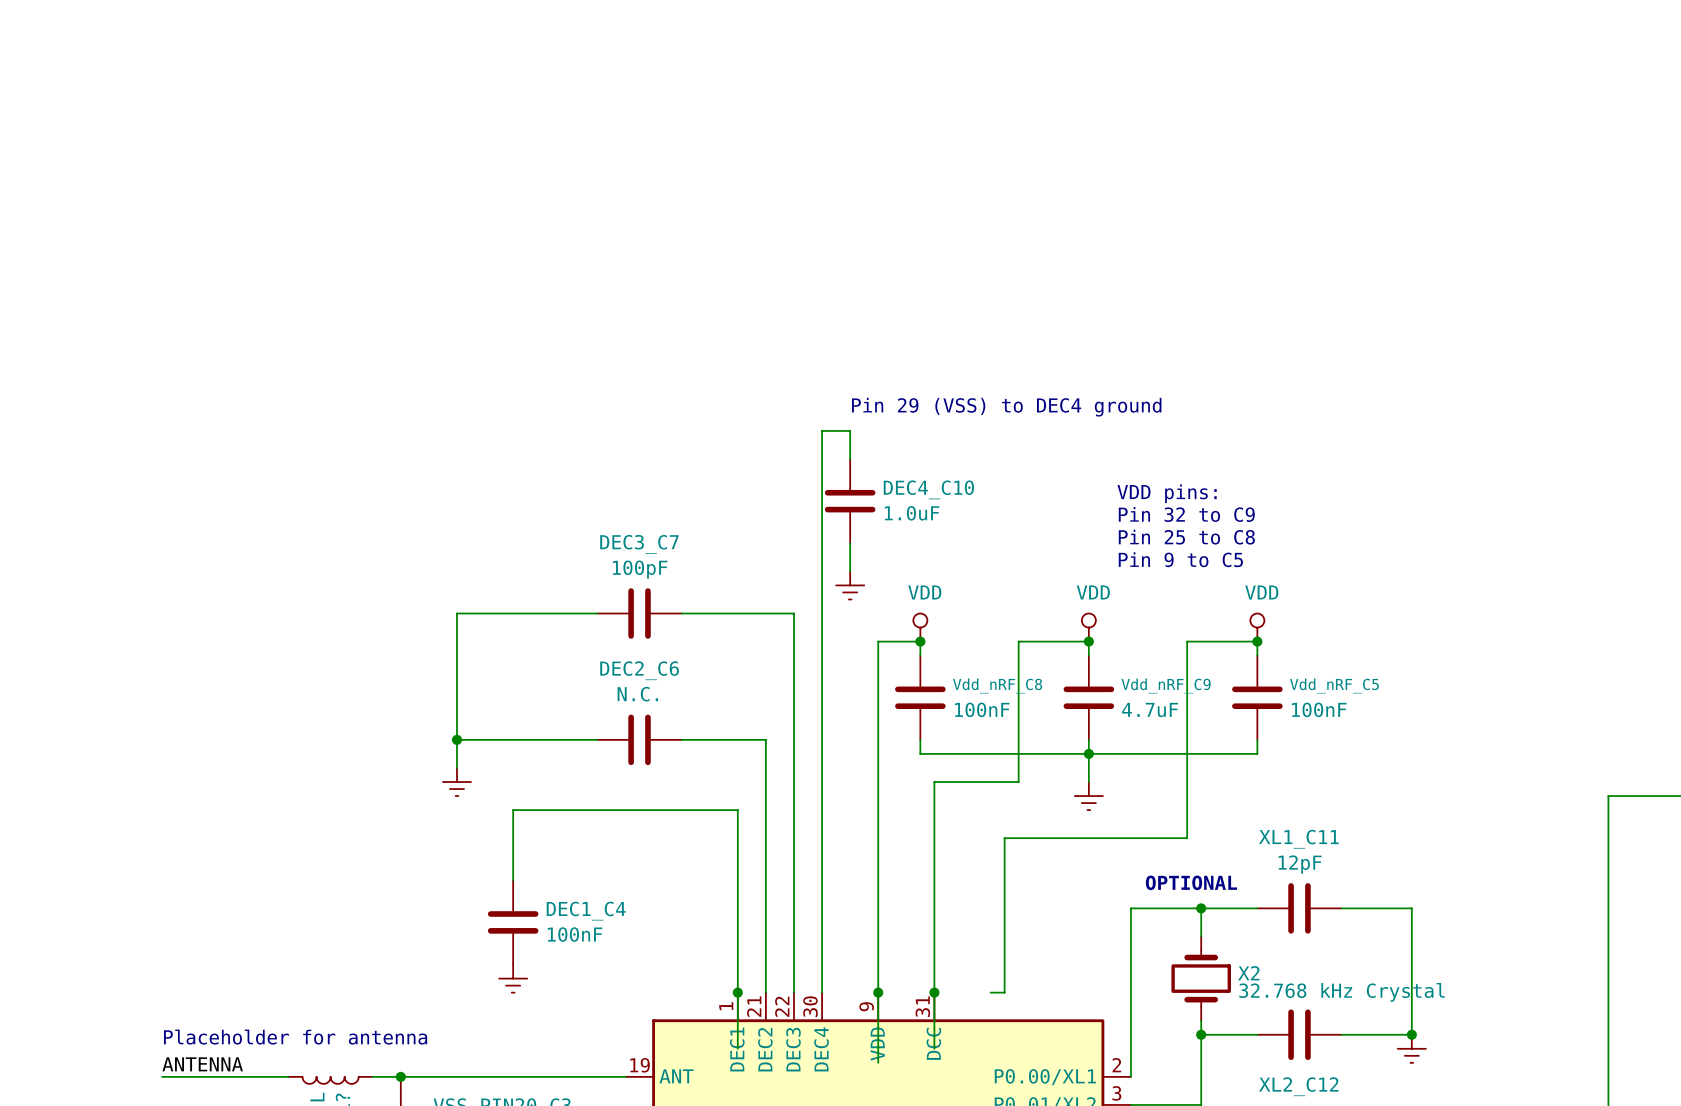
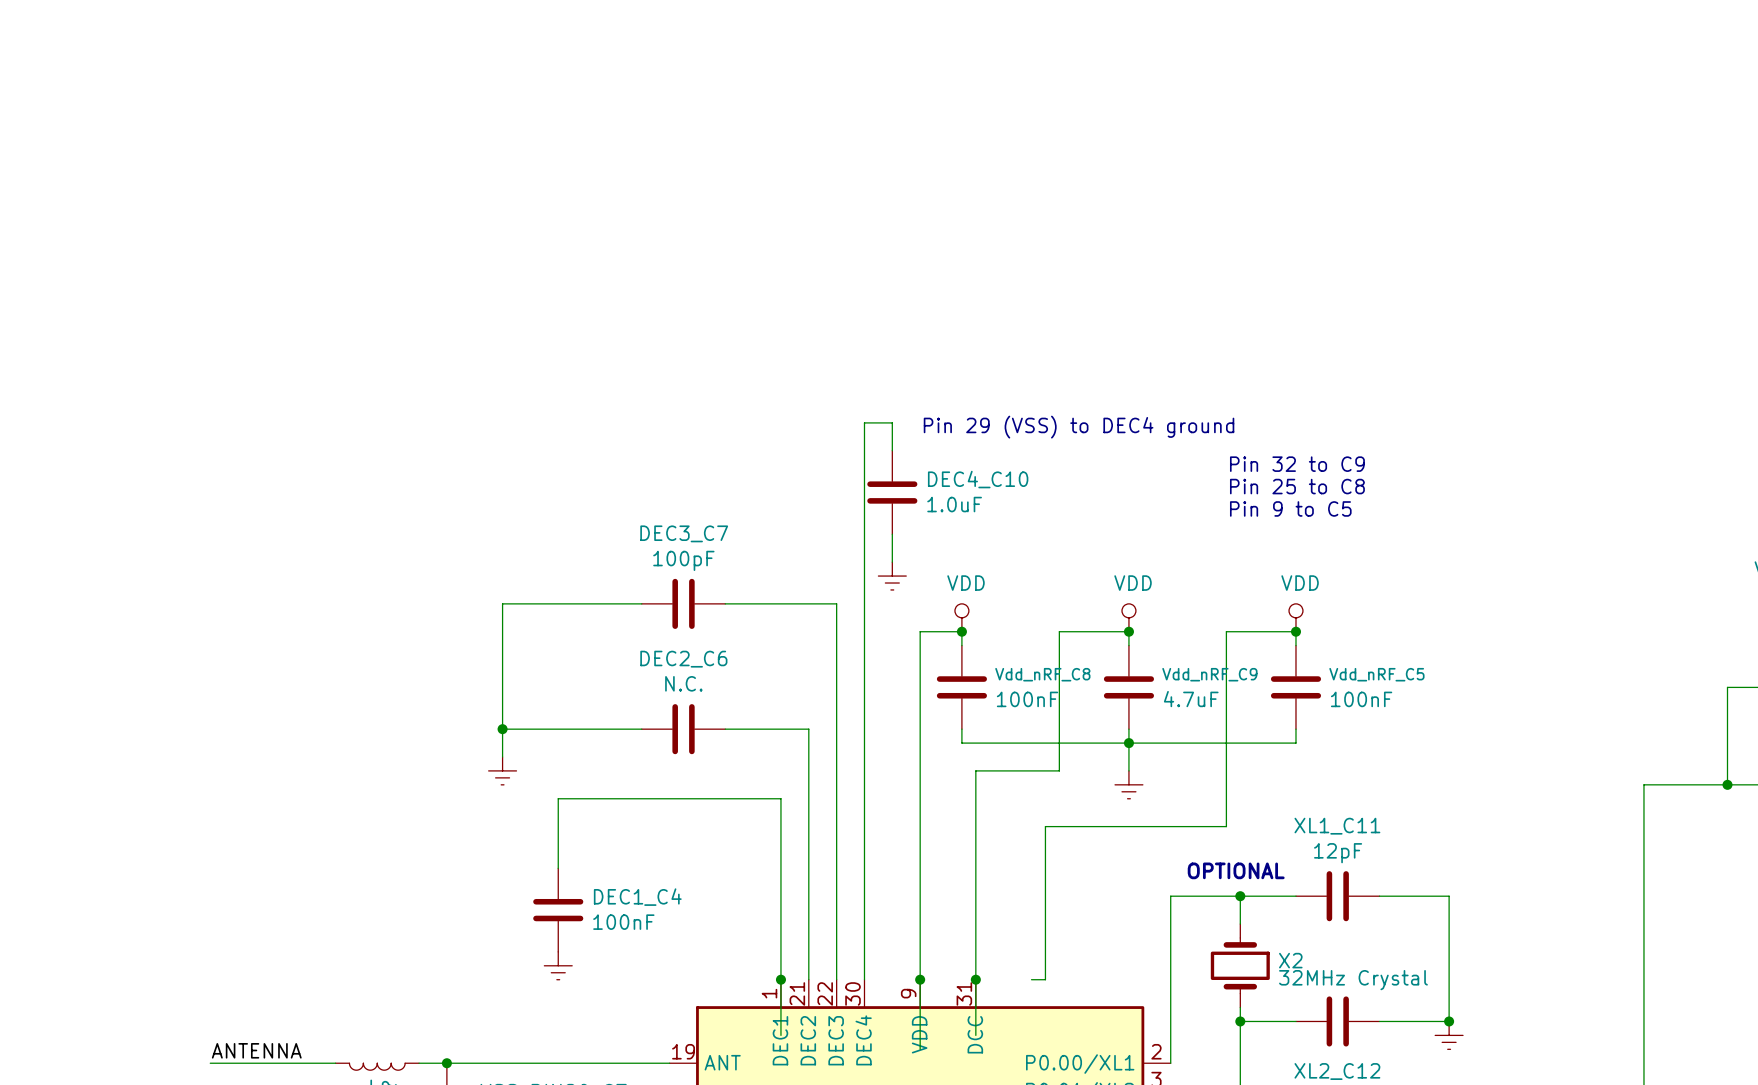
text position: Pin 29 (VSS) to DEC4 ground (1006, 407) -> Pin 29 (VSS) to DEC4 ground (1079, 427)
text: VDD pins: (1167, 493) -> none
text position: Pin 32 to C9 (1186, 514) -> Pin 32 to C9 (1297, 464)
text position: Pin 25 to C8 (1186, 537) -> Pin 25 to C8 (1297, 486)
text position: Pin 9 to C5 (1180, 559) -> Pin 9 to C5 (1290, 508)
X2 value: 32.768 kHz Crystal (1342, 992) -> 32MHz Crystal (1353, 980)
text: Placeholder for antenna (295, 1037) -> none

